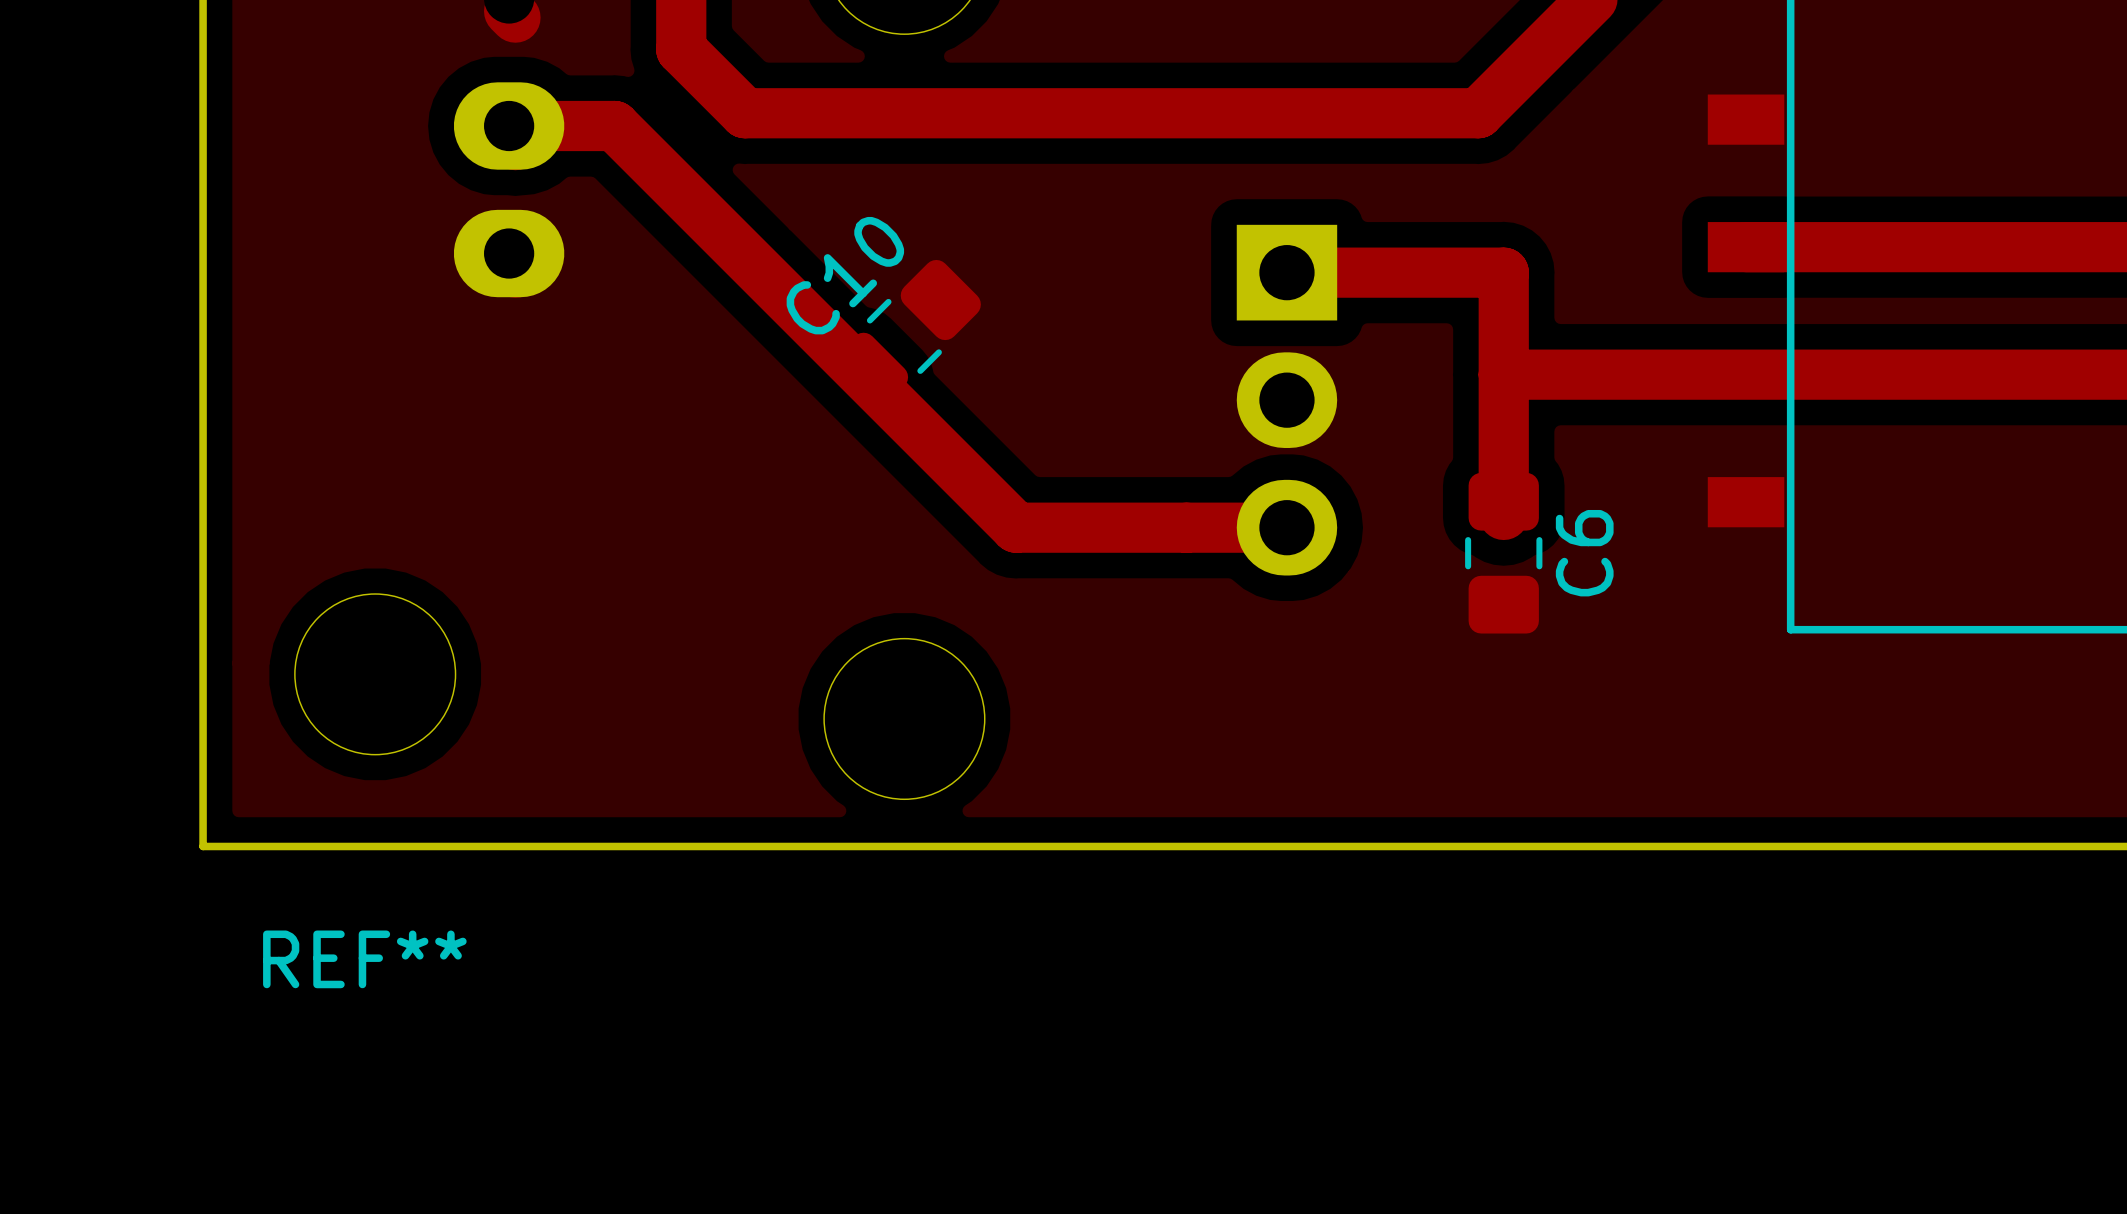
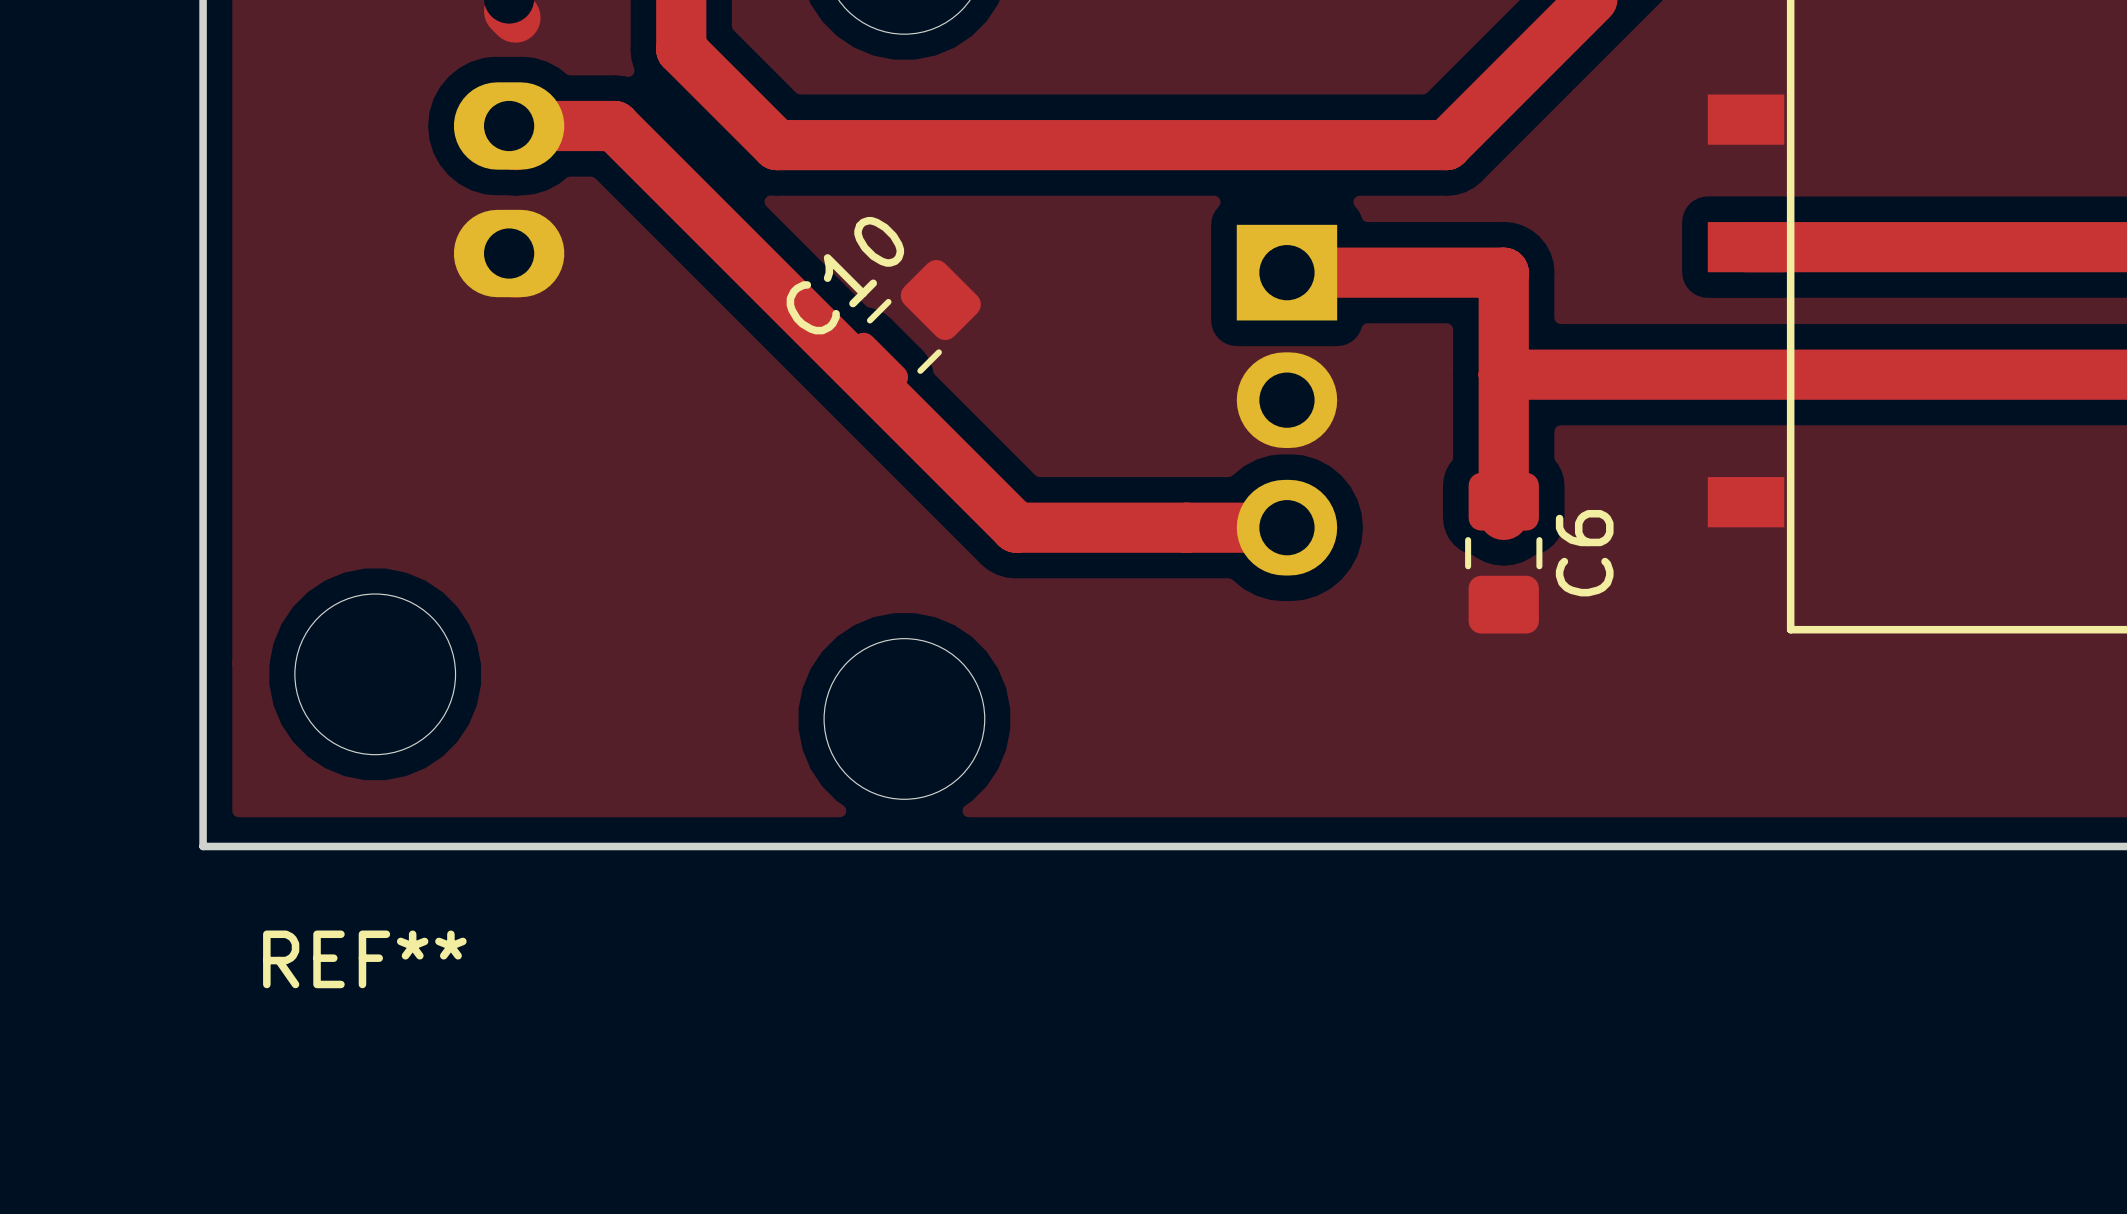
top track: (745, 113) (1478, 113) -> (745, 113) (776, 145) (1446, 145) (1478, 113)

